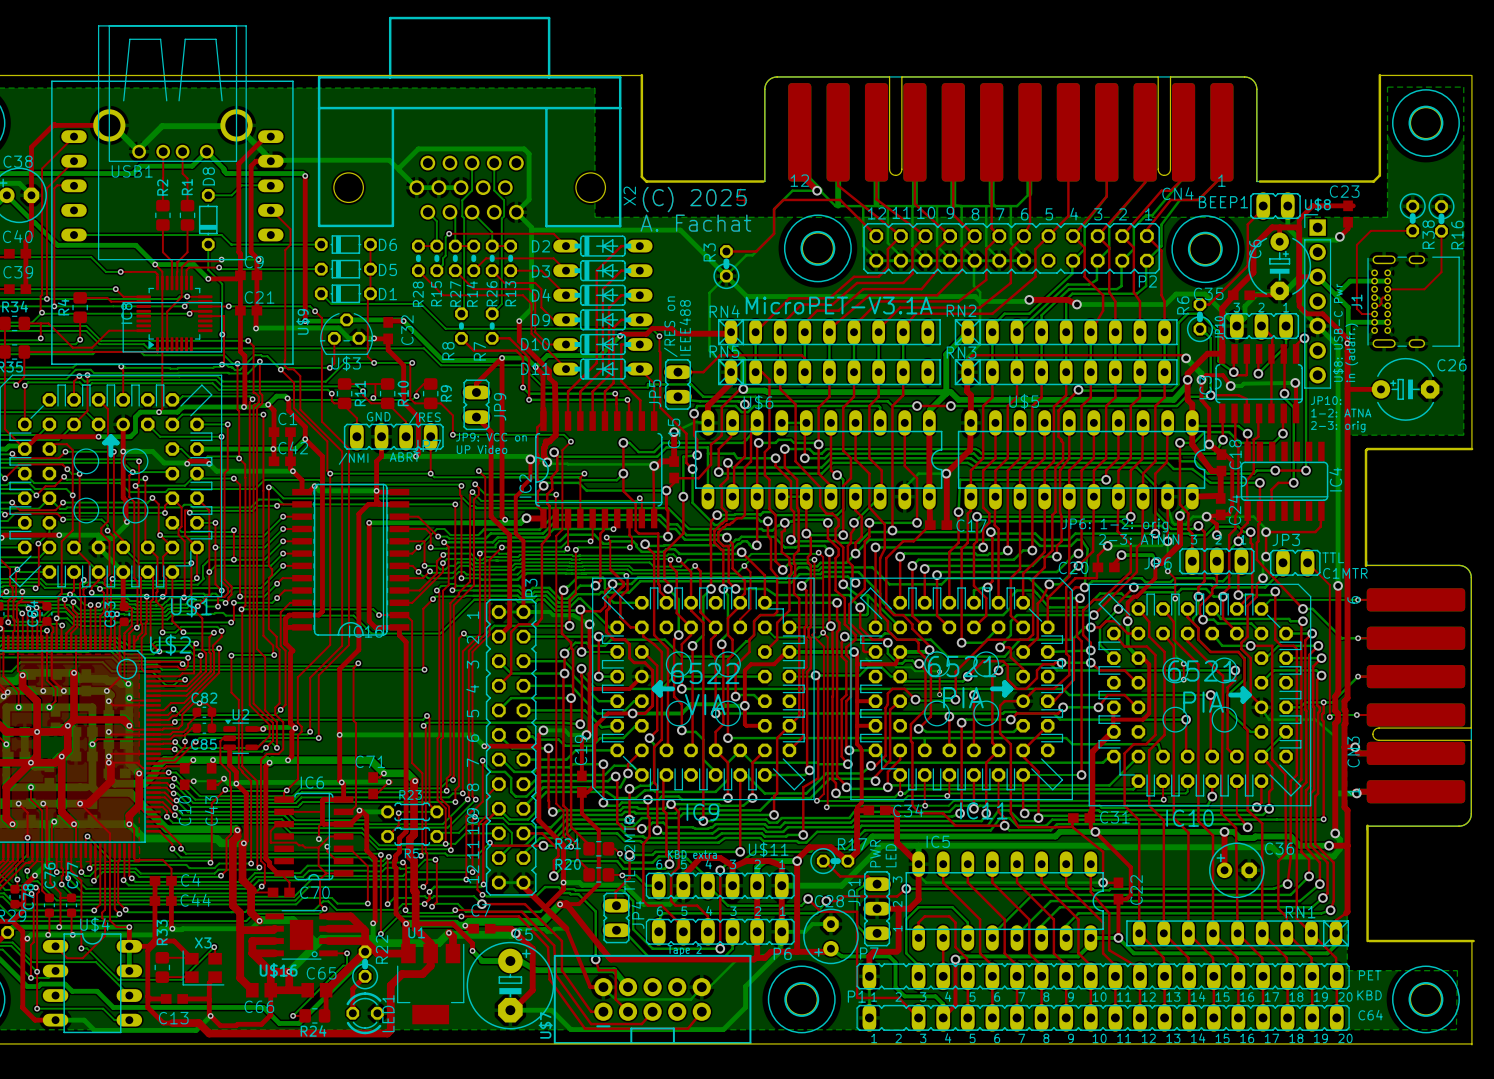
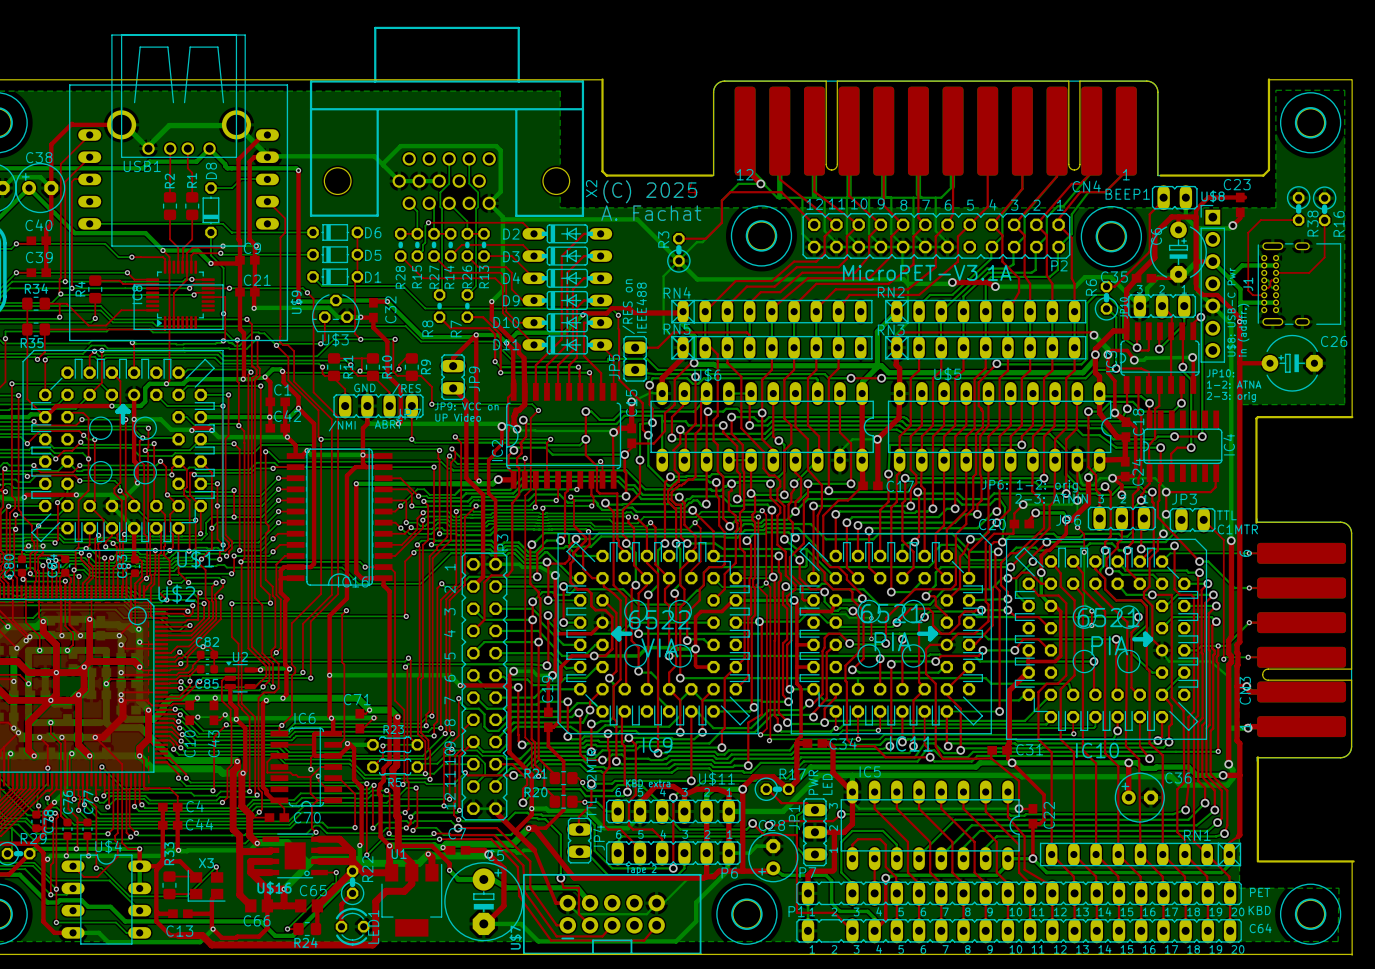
text position: MicroPET-V3.1A (839, 305) -> MicroPET-V3.1A (927, 272)

